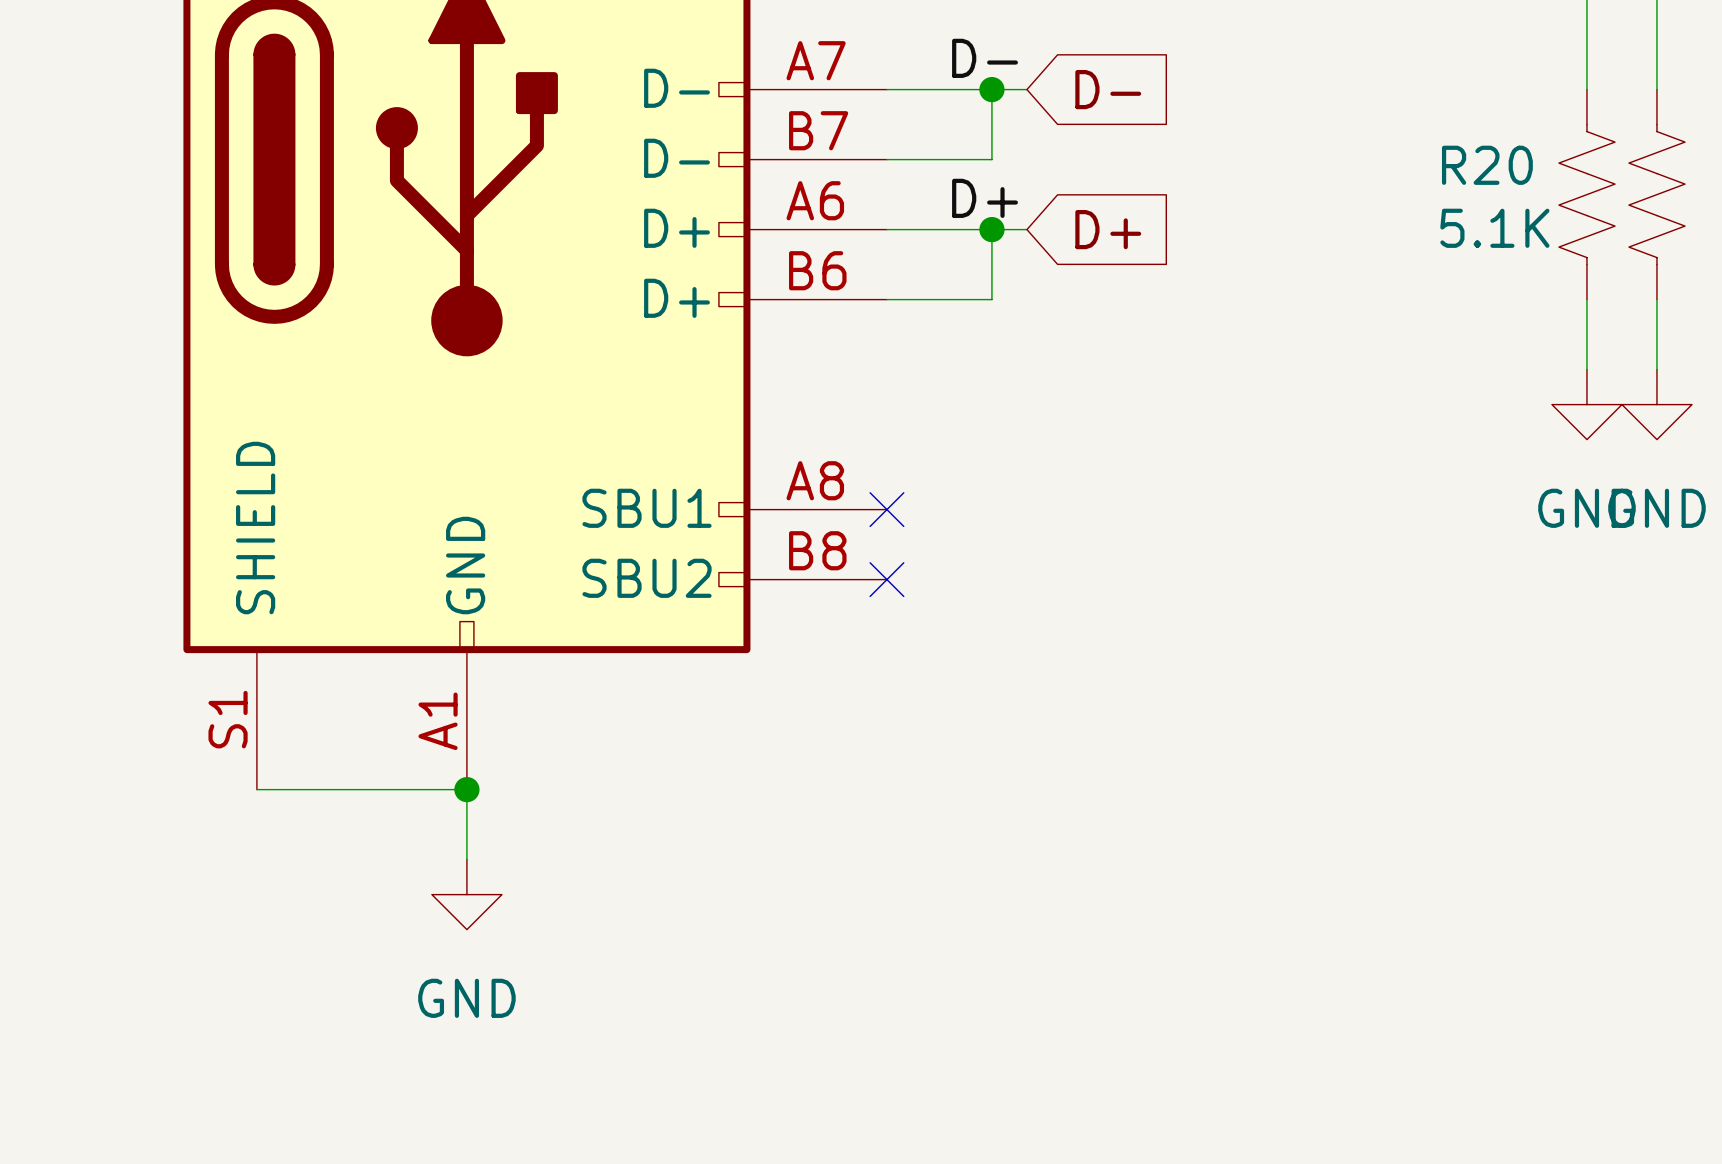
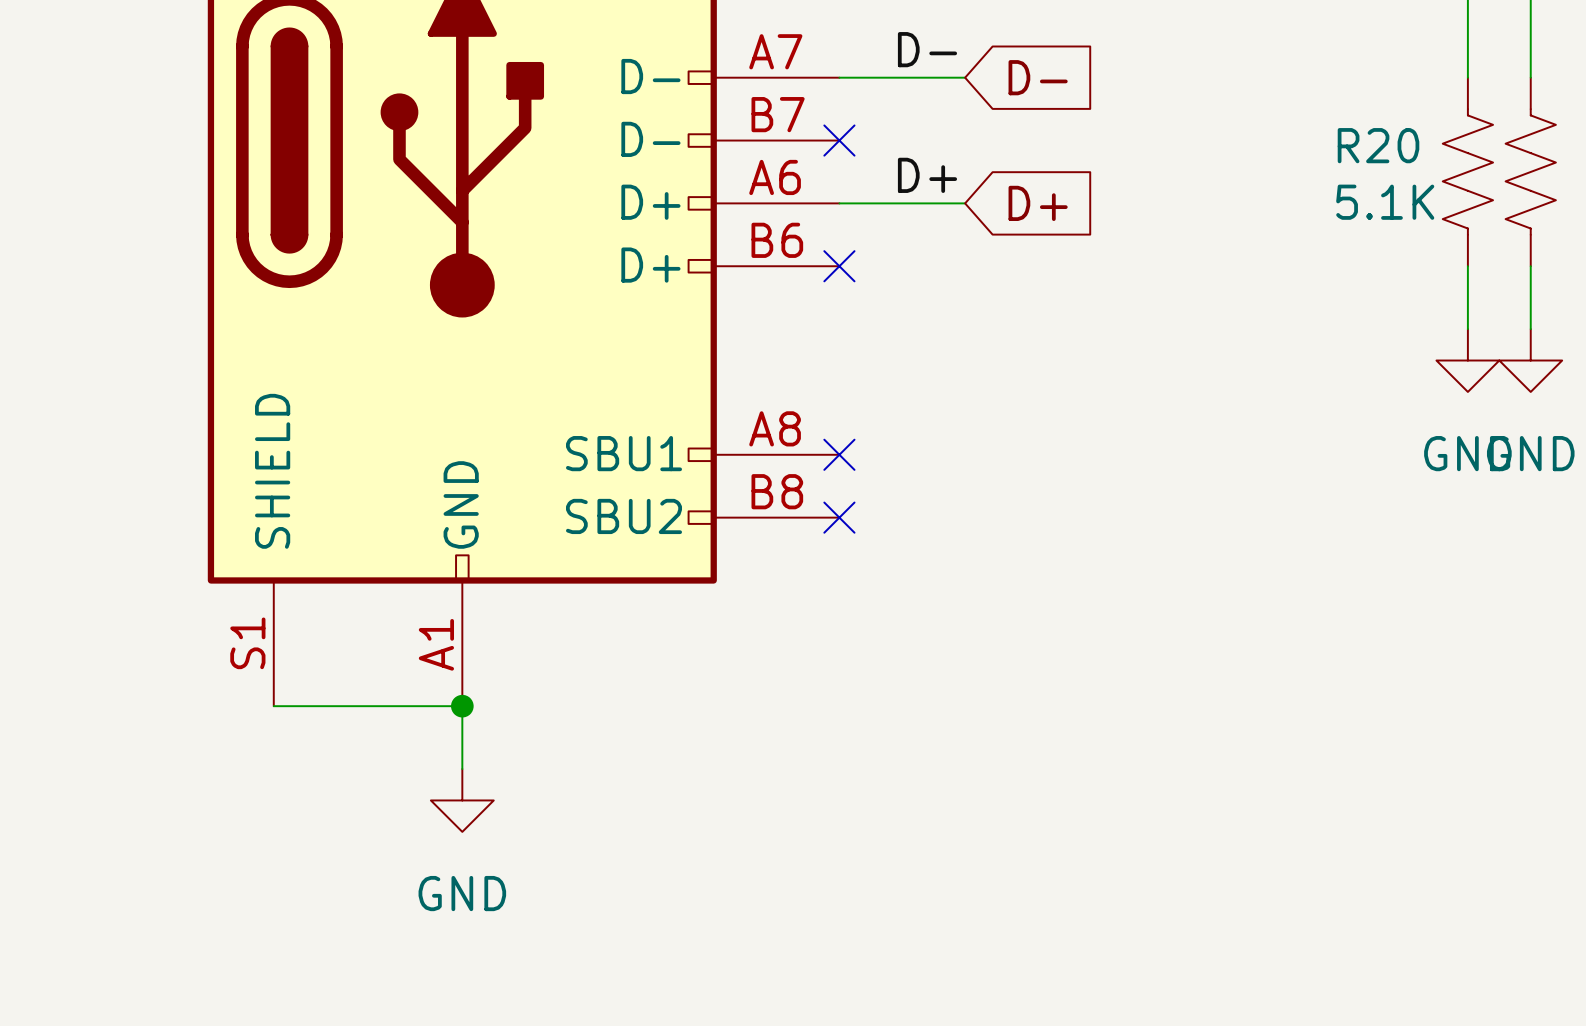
wire: (991, 89) (991, 159) (886, 159) -> none
junction: (991, 89) -> none
no-connect mark: none -> (839, 140)
wire: (991, 229) (991, 299) (886, 299) -> none
junction: (991, 229) -> none
no-connect mark: none -> (839, 266)

